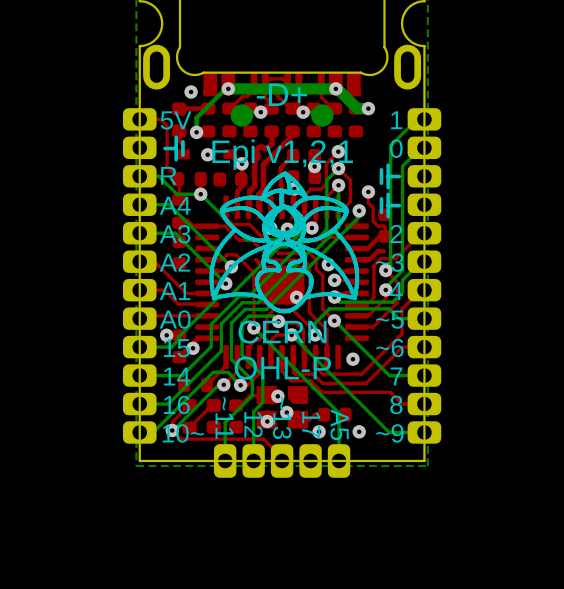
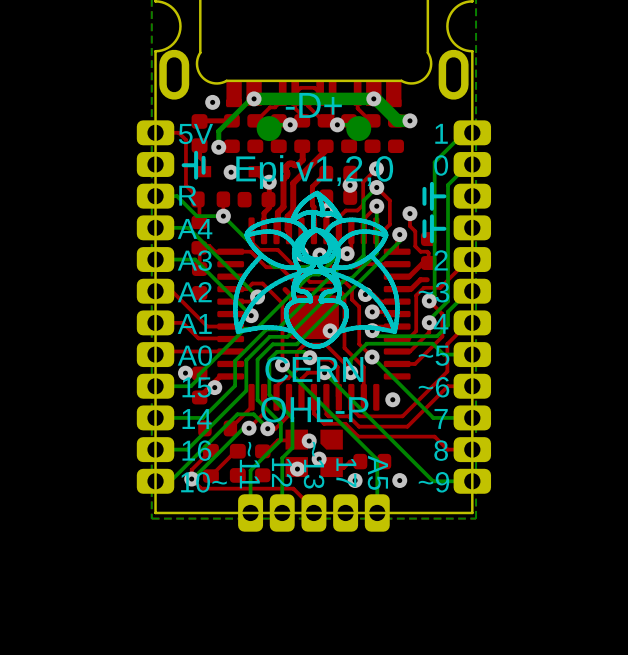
text: Epi v1,2,1 (282, 154) -> Epi v1,2,0 (314, 172)

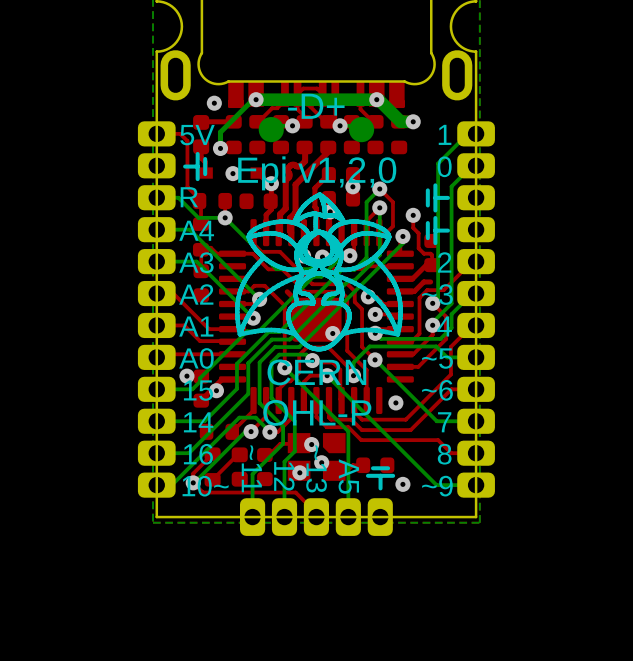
top track: (376, 168) (363, 182) (363, 204) (357, 210) (345, 210) (338, 217) (338, 230) -> none
via: (376, 168) -> none
bottom track: (345, 428) (377, 459) (377, 512) -> (348, 431) (348, 517)
line: none -> (388, 468) (373, 468)
text: 17 (346, 472) -> A5 (348, 476)
line: none -> (380, 475) (380, 488)
text: A5 (377, 472) -> none
line: none -> (393, 475) (367, 475)
via: (355, 480) -> none

